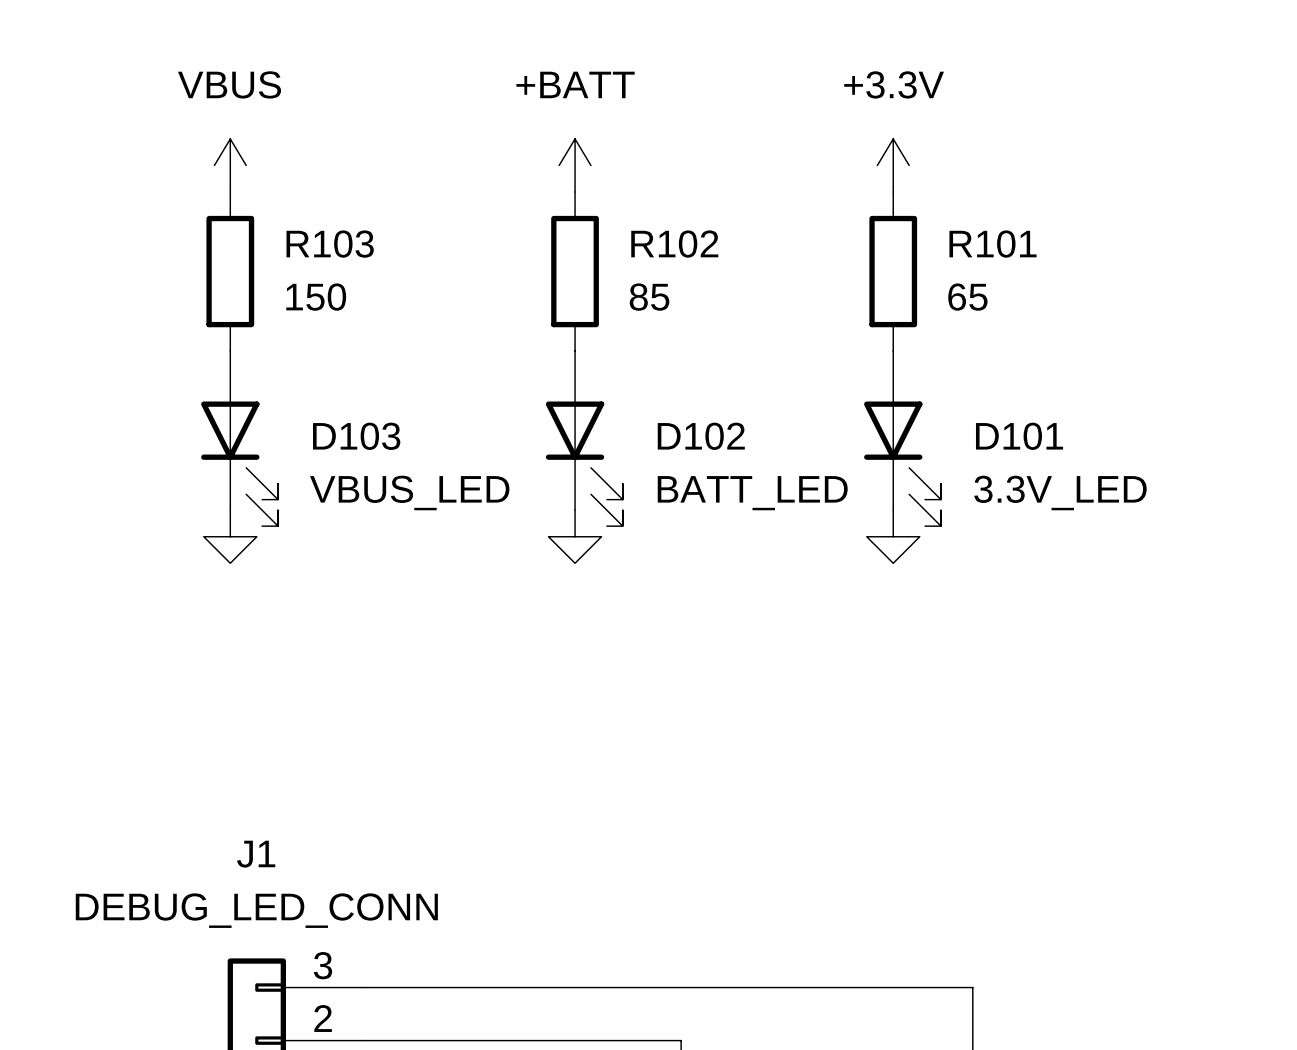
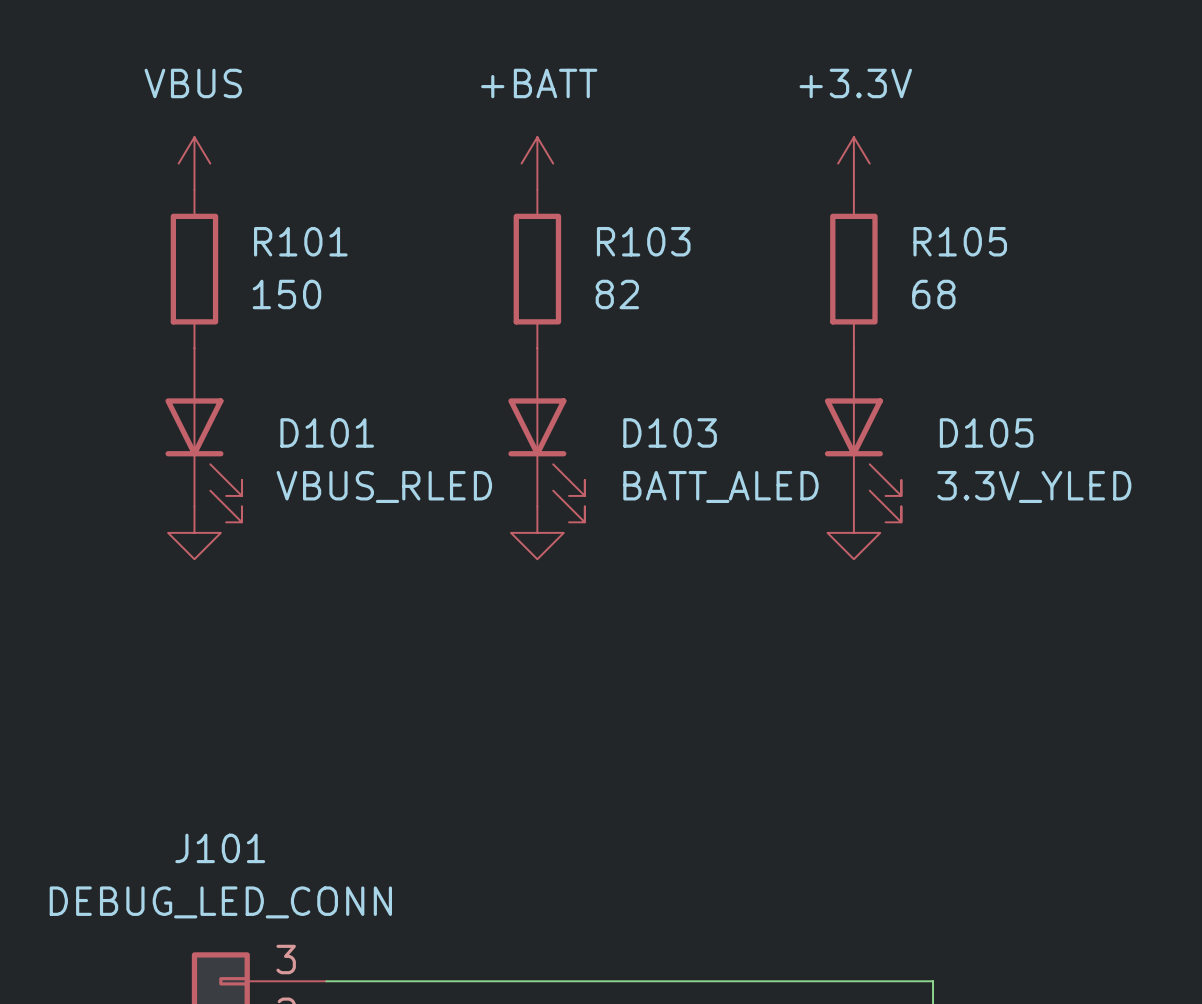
R103 name: R103 (330, 244) -> R101 (300, 241)
R102 name: R102 (674, 244) -> R103 (643, 241)
R101 name: R101 (993, 244) -> R105 (960, 241)
R102 value: 85 (649, 297) -> 82 (617, 294)
R101 value: 65 (967, 297) -> 68 (933, 294)
D103 name: D103 (356, 436) -> D101 (327, 432)
D102 name: D102 (701, 436) -> D103 (670, 432)
D101 name: D101 (1019, 436) -> D105 (986, 432)
D103 value: VBUS_LED (409, 492) -> VBUS_RLED (384, 486)
D101 value: 3.3V_LED (1060, 492) -> 3.3V_YLED (1034, 486)
D102 value: BATT_LED (752, 493) -> BATT_ALED (720, 486)
J1 name: J1 (256, 854) -> J101 (220, 848)

